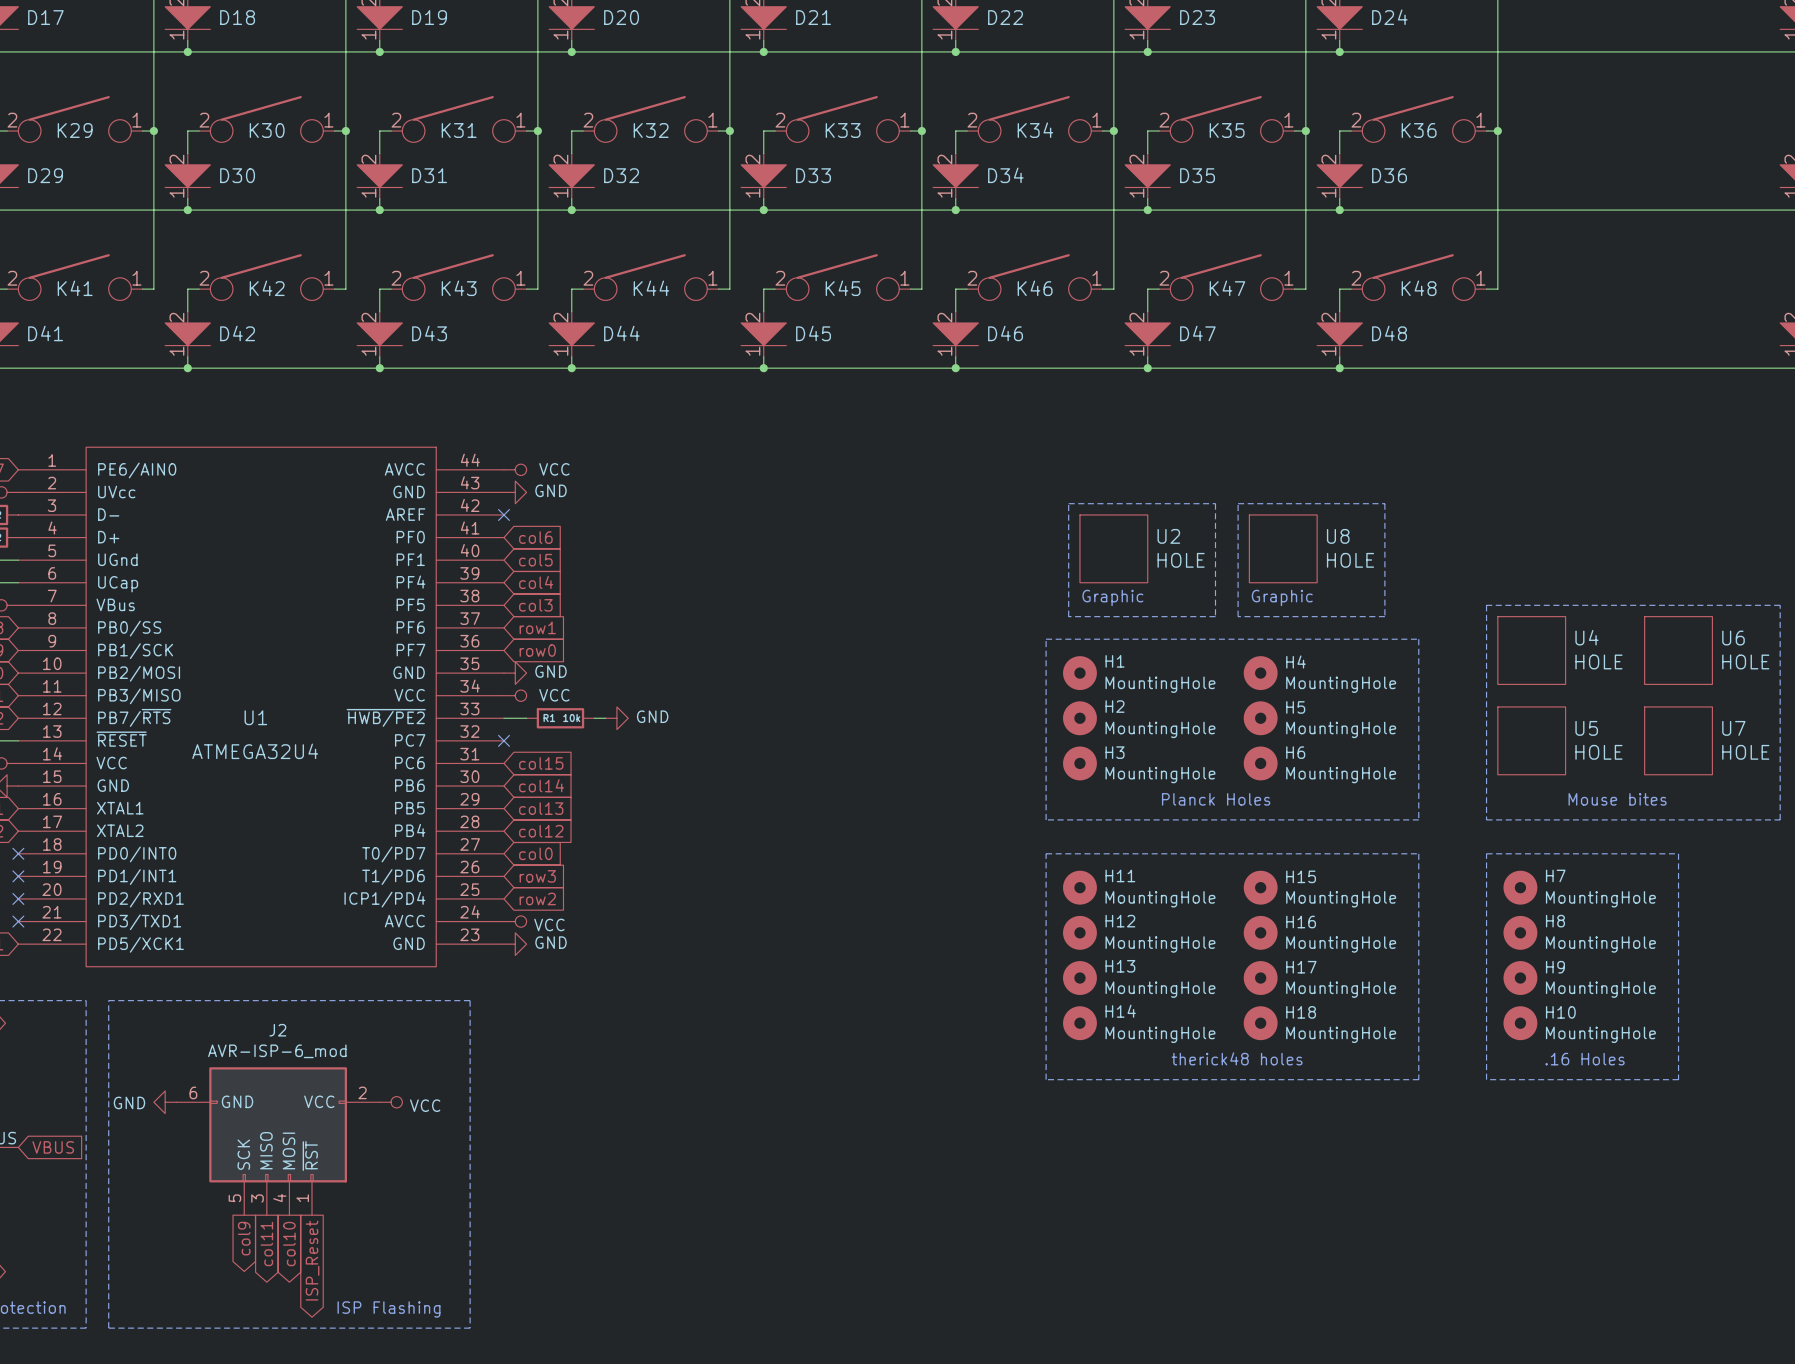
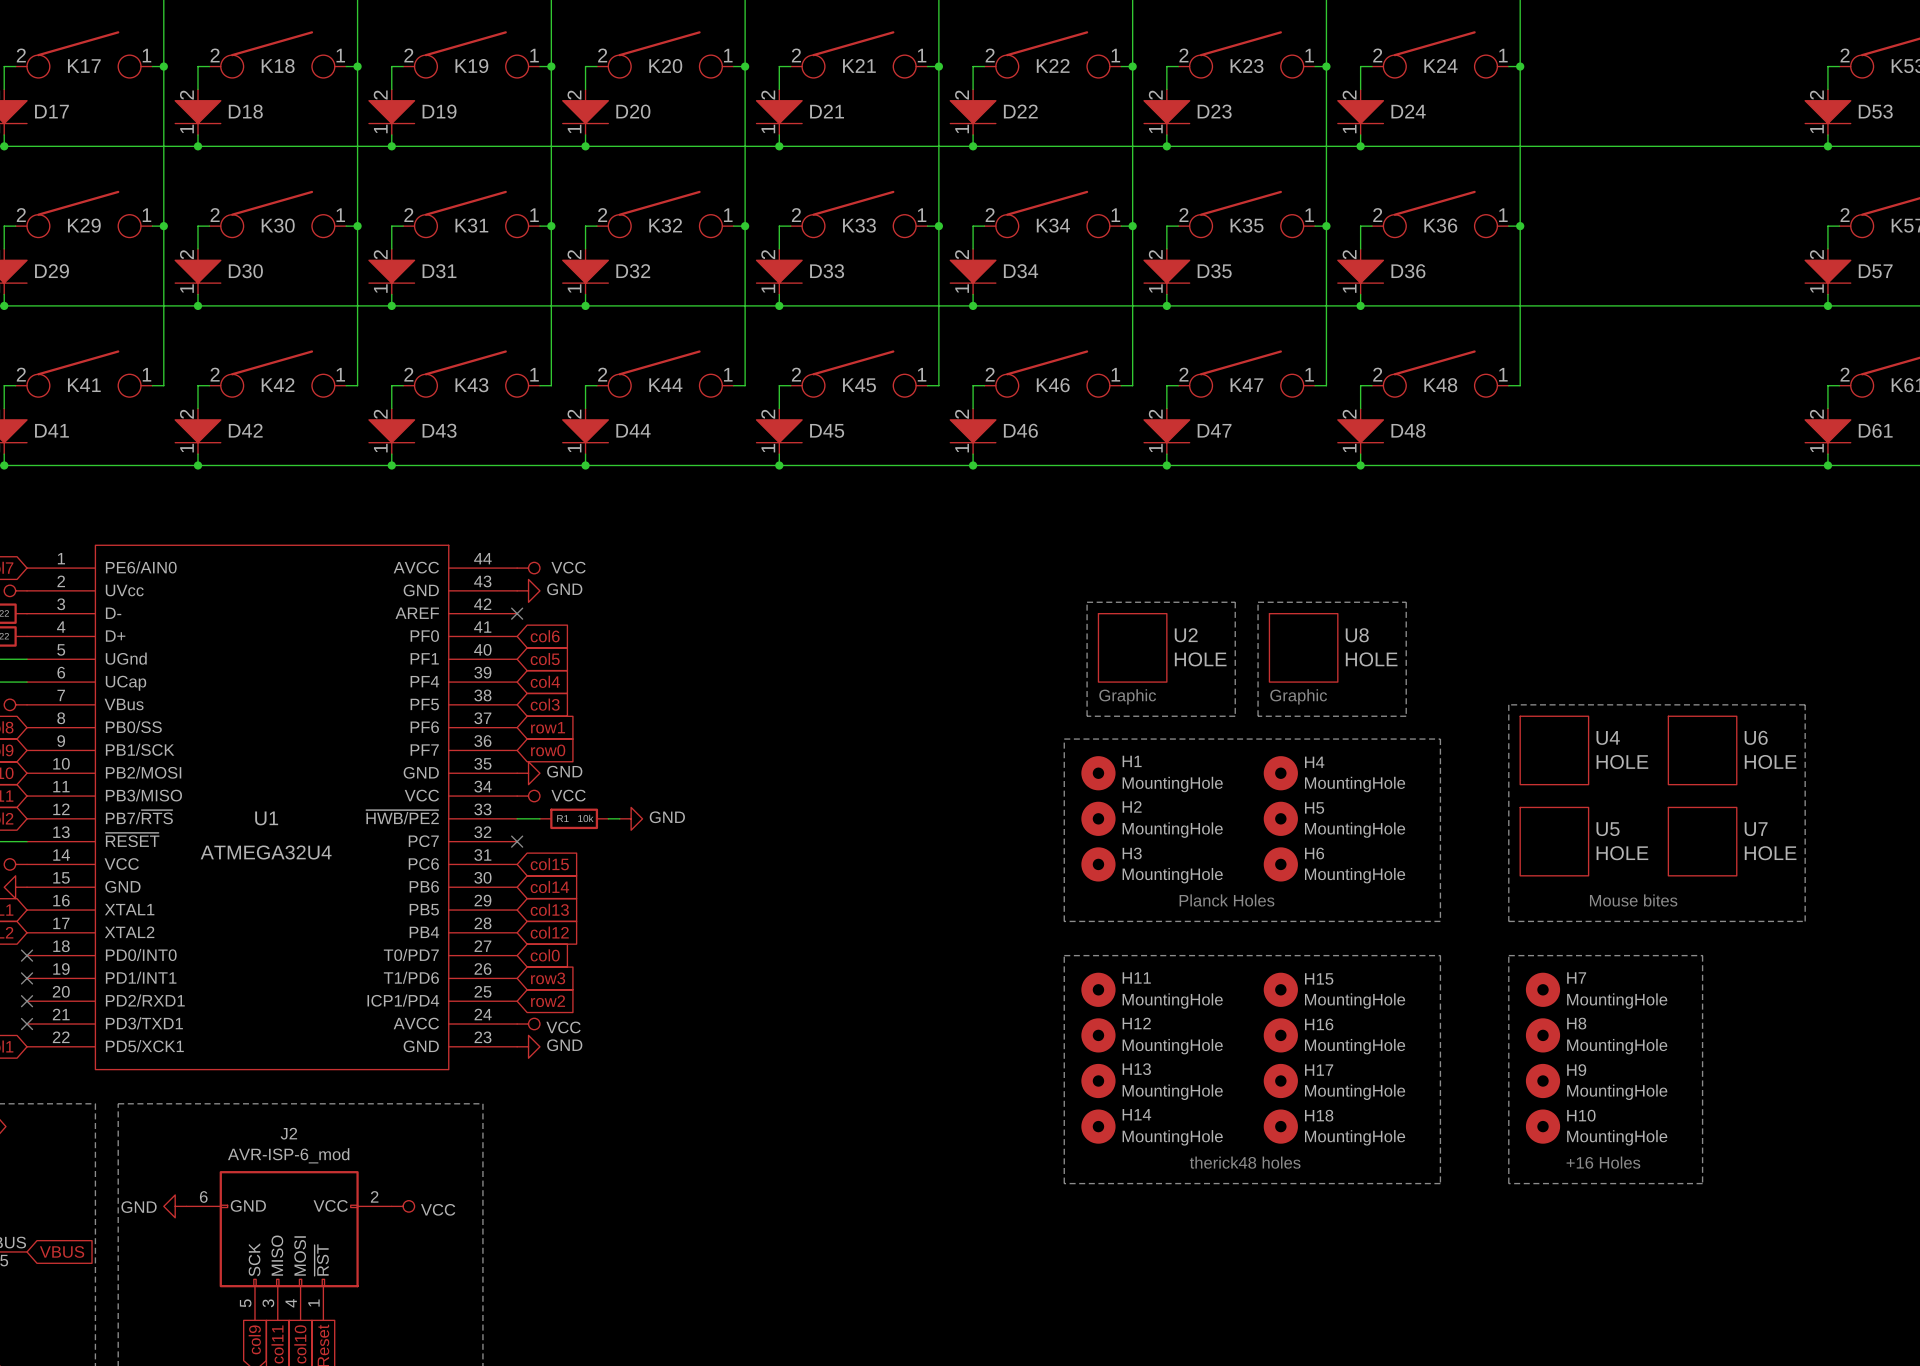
text: .16 Holes (1585, 1059) -> +16 Holes (1603, 1162)

